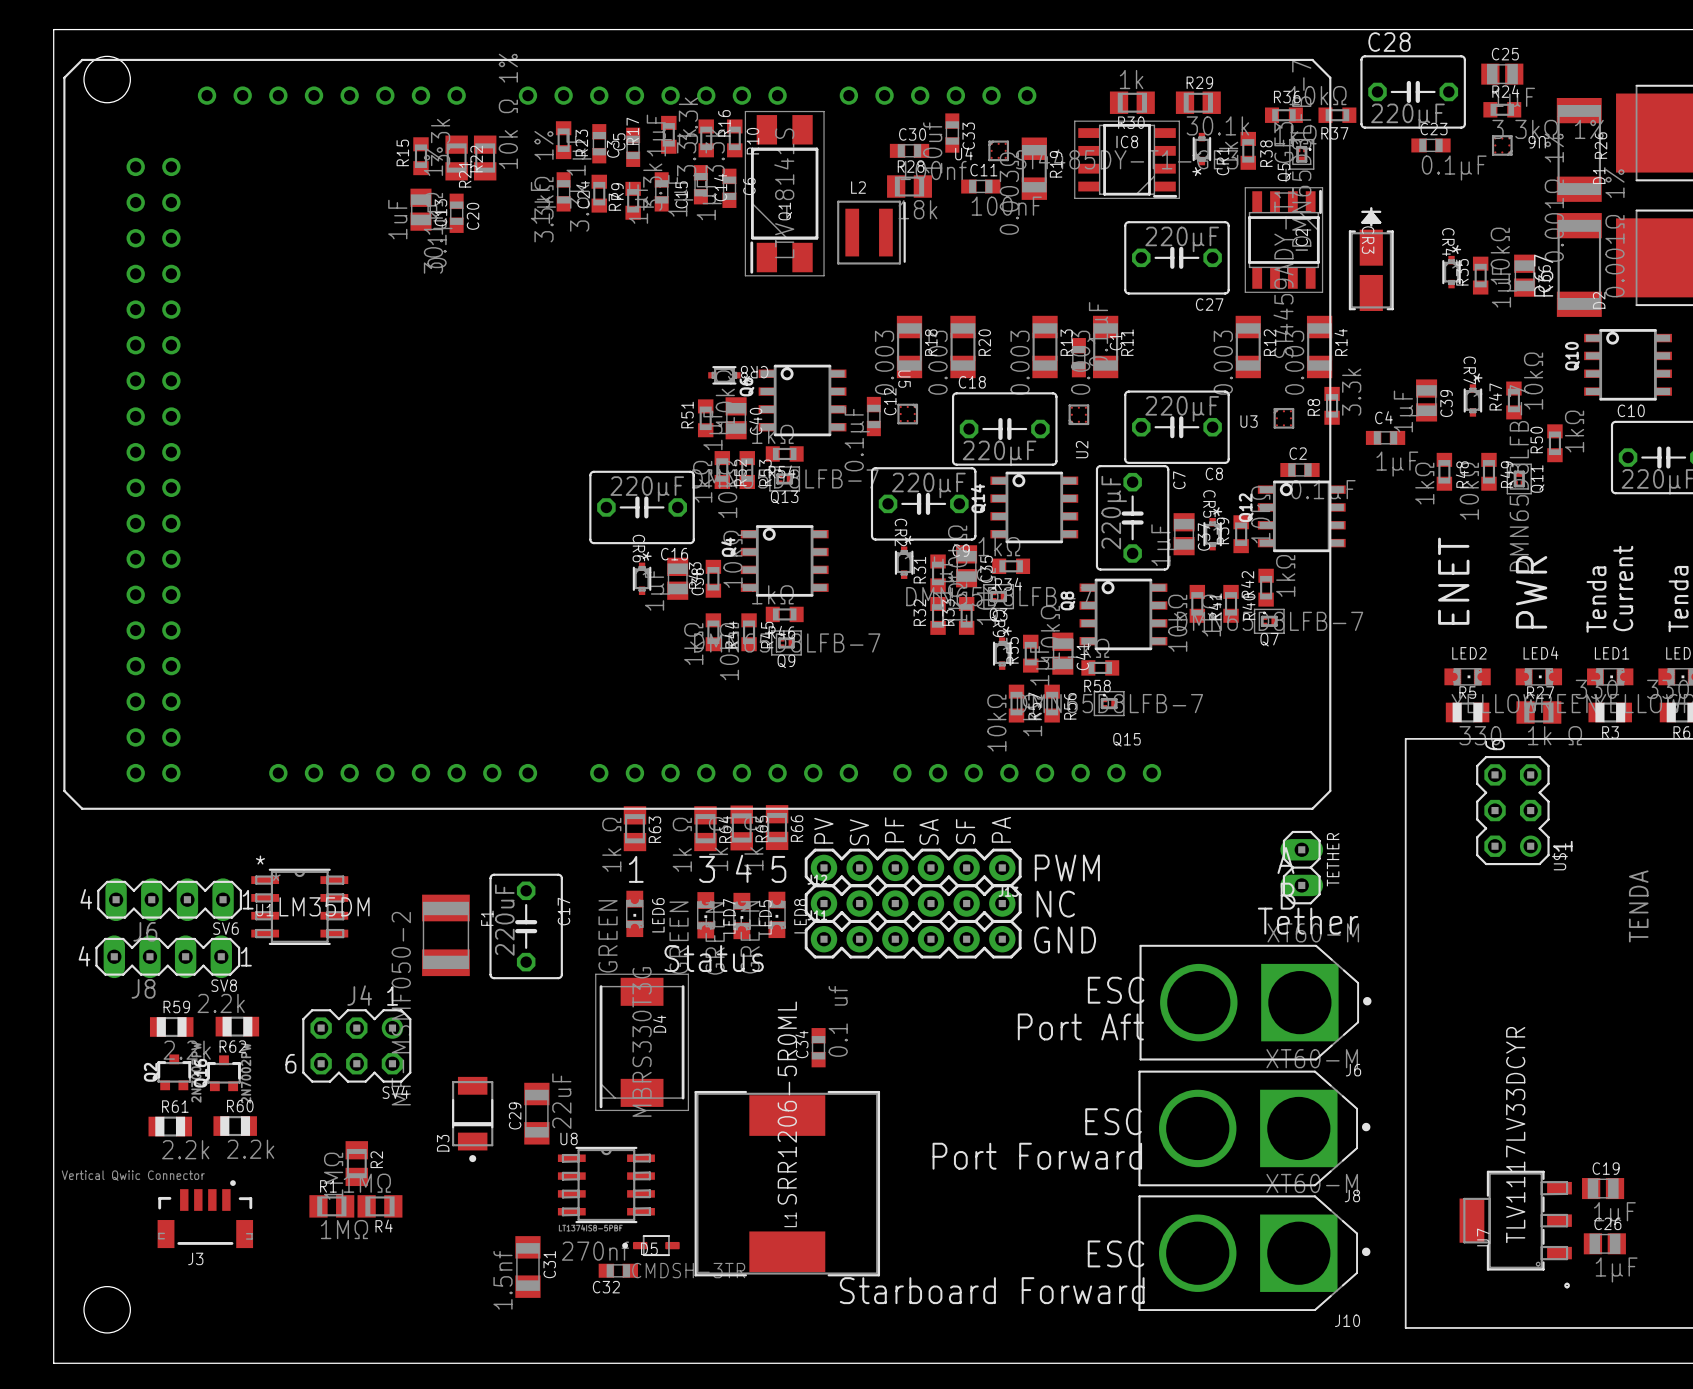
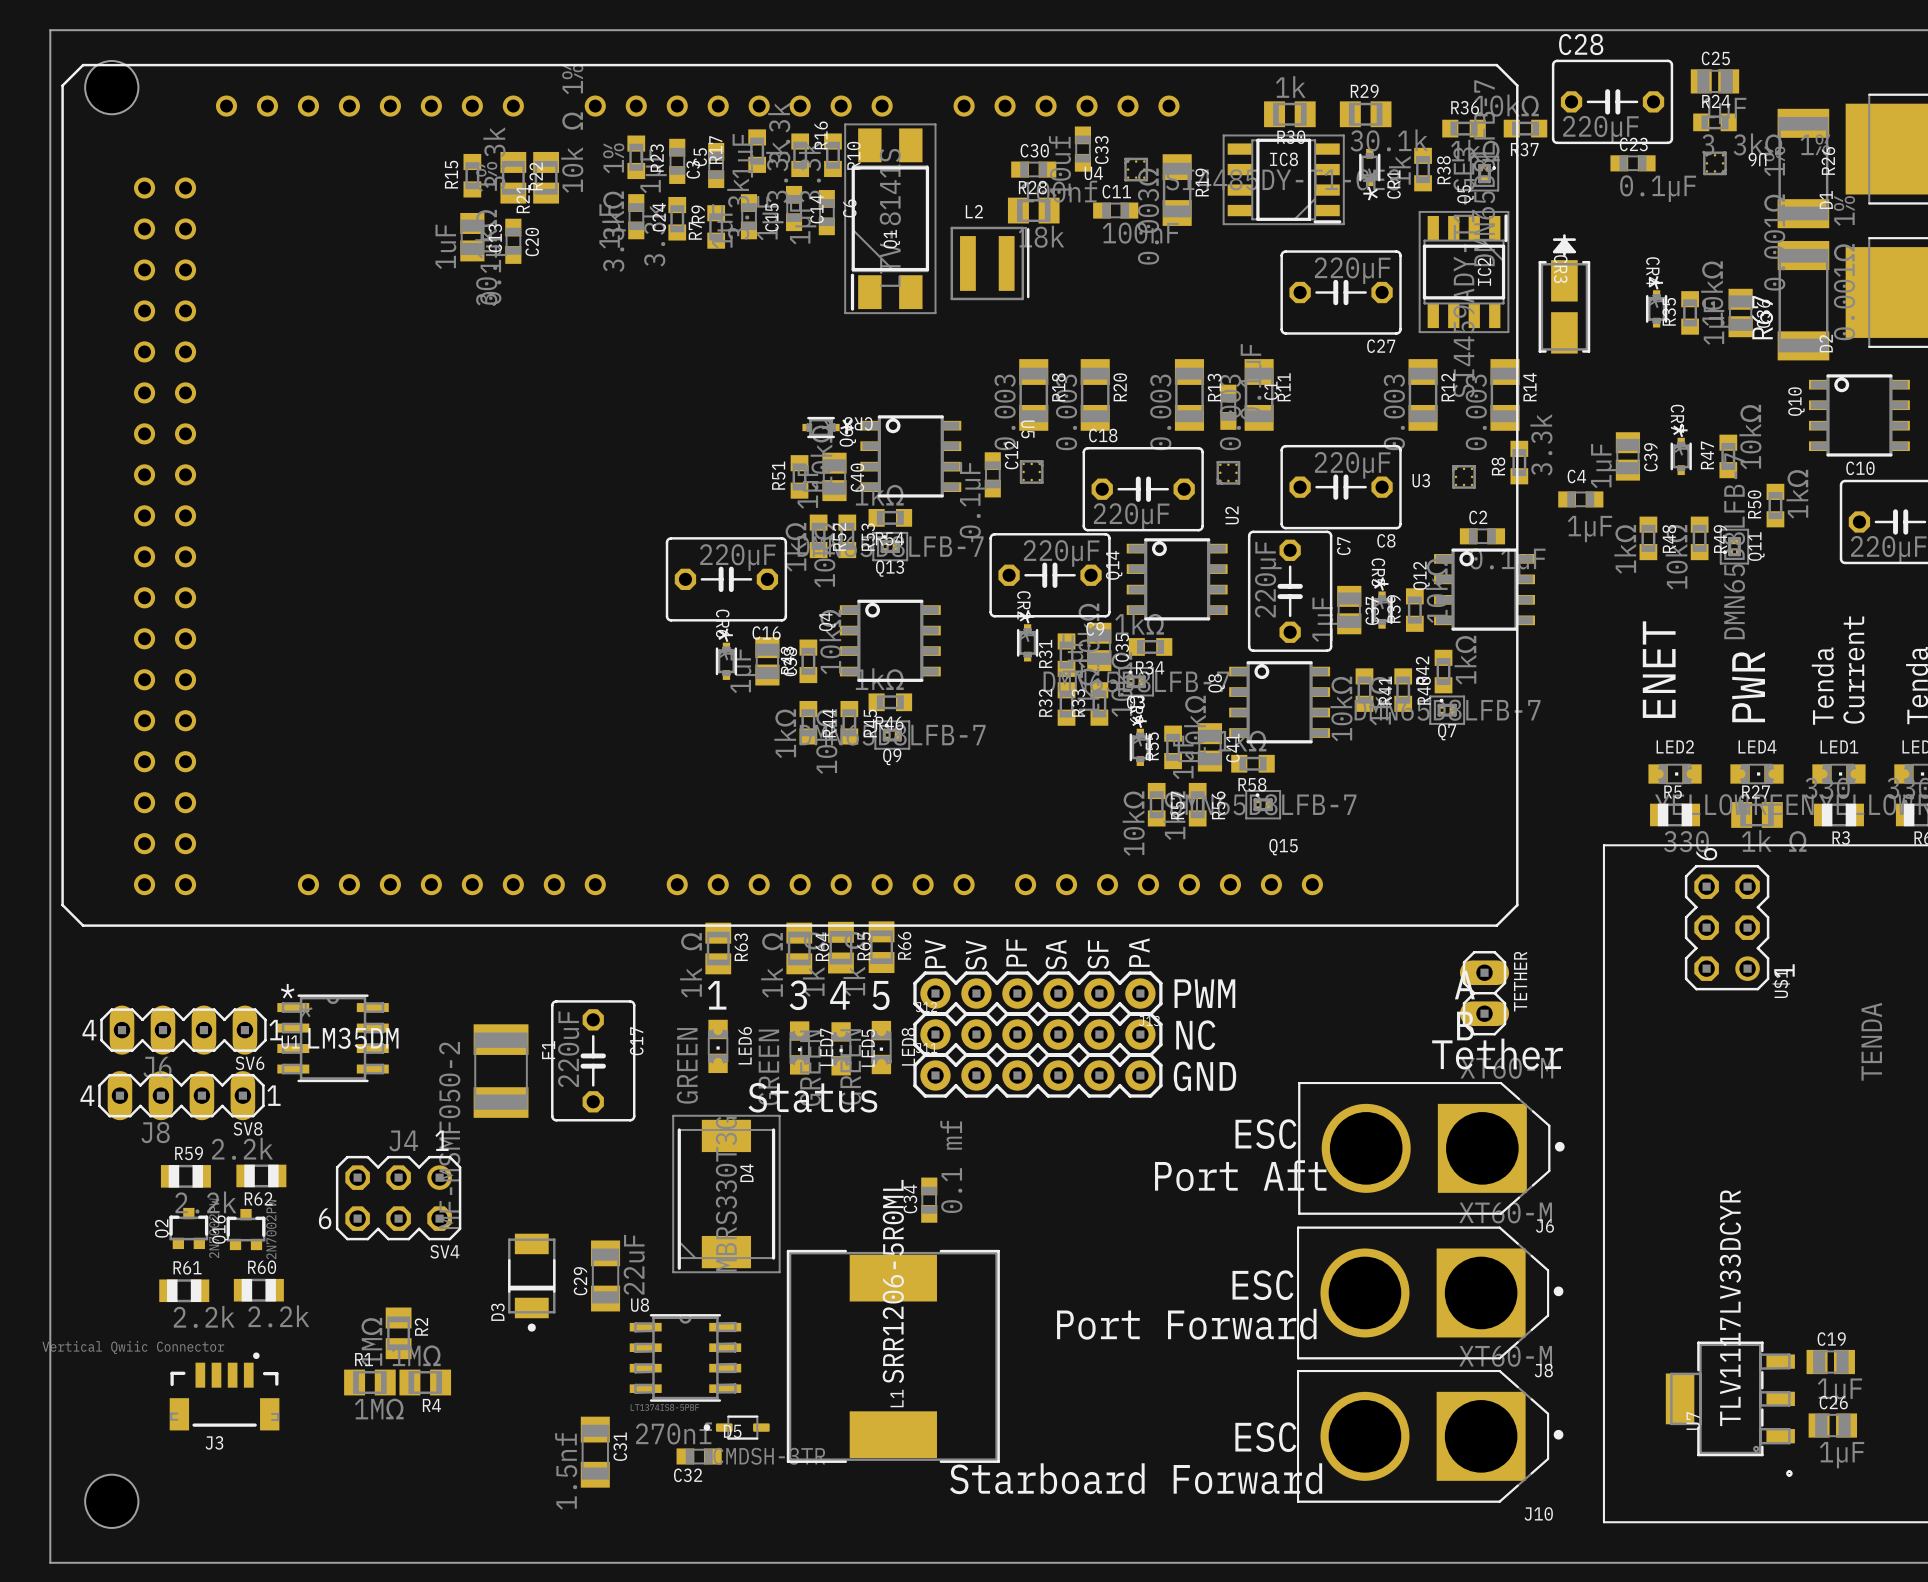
C34 value: 0.1 uf (838, 1021) -> 0.1 mf (951, 1166)

